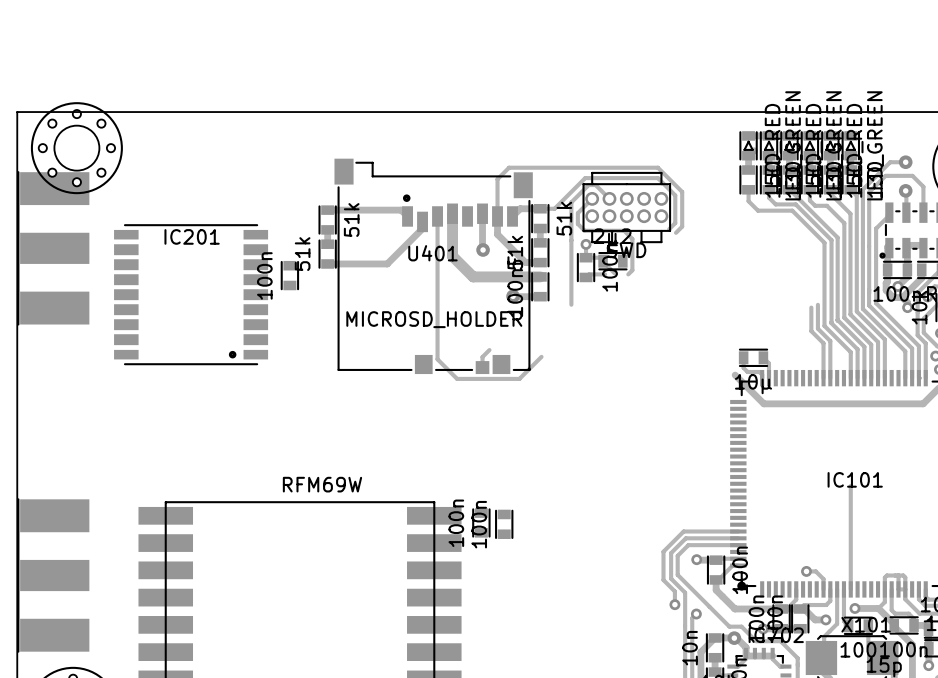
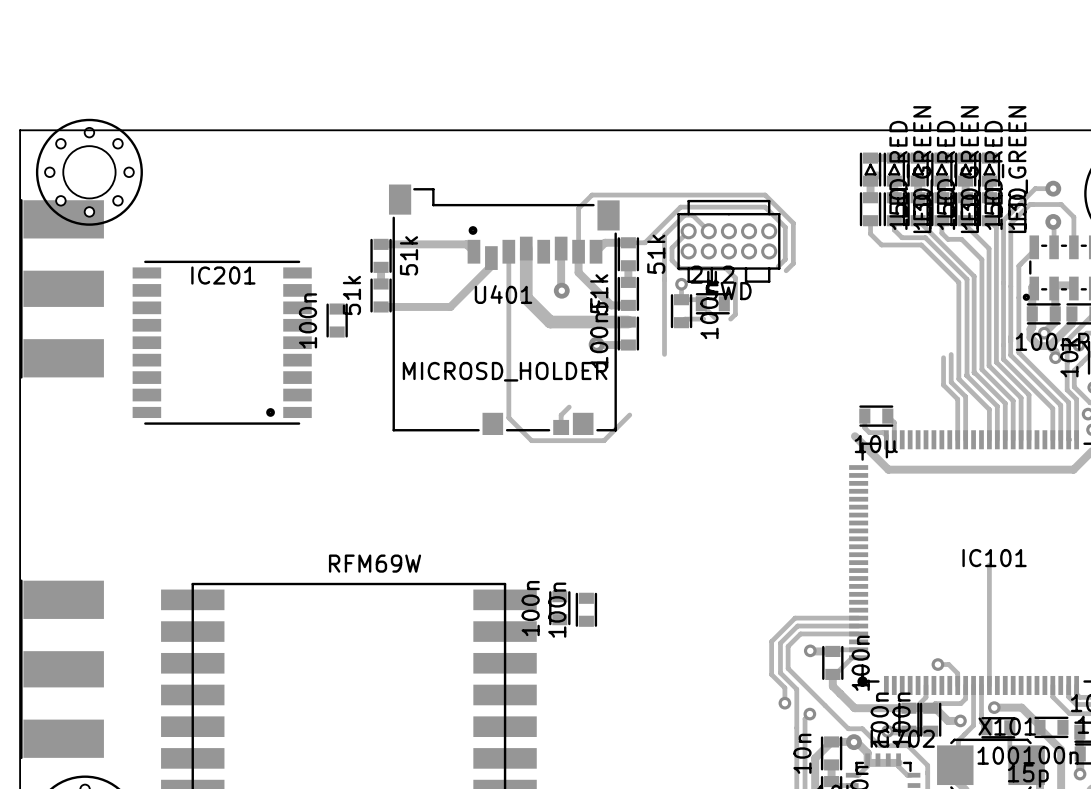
track: (898, 575) (898, 589) (905, 589) (905, 577) (903, 575) (886, 575) (884, 577) (884, 602) (878, 608) -> none
track: (891, 589) (891, 610) (895, 613) (908, 613) (914, 618) (914, 625) (924, 625) (928, 629) -> none

